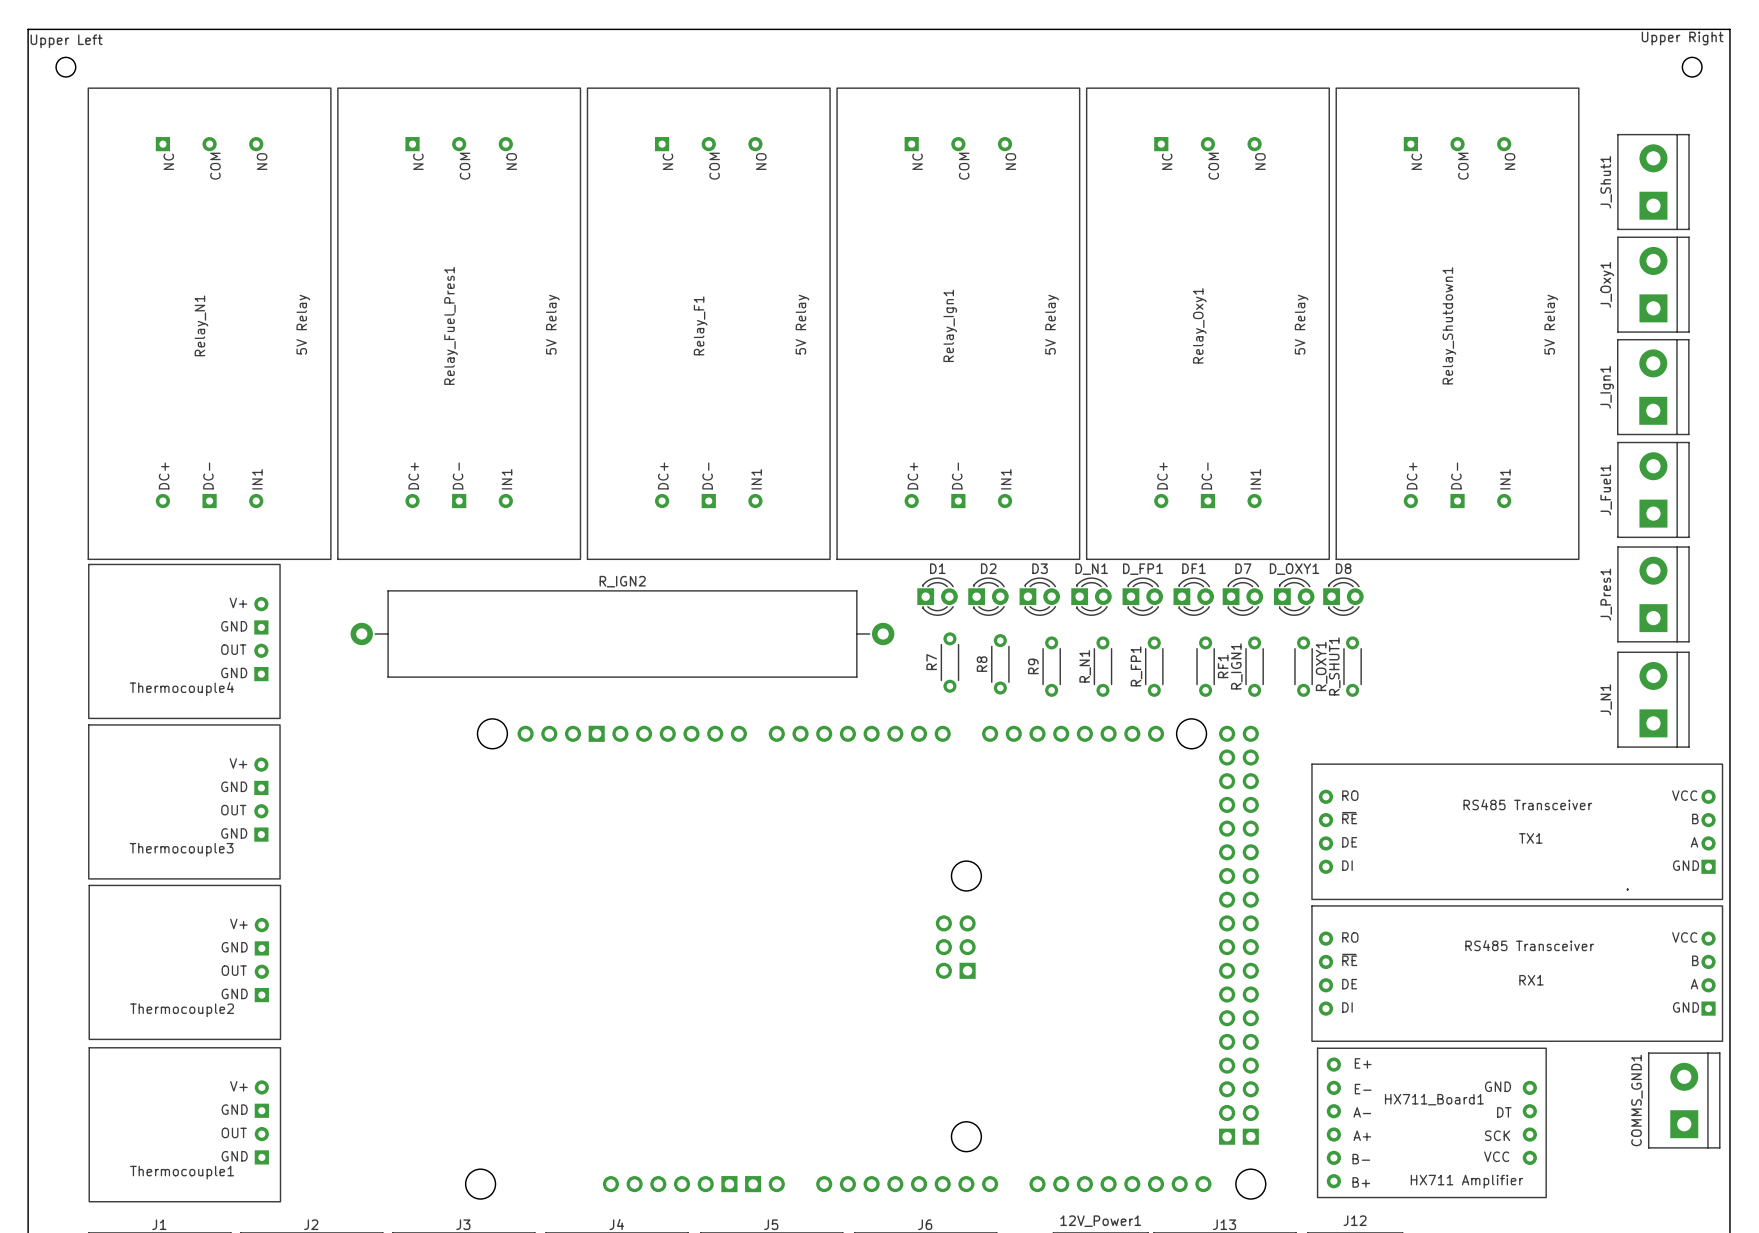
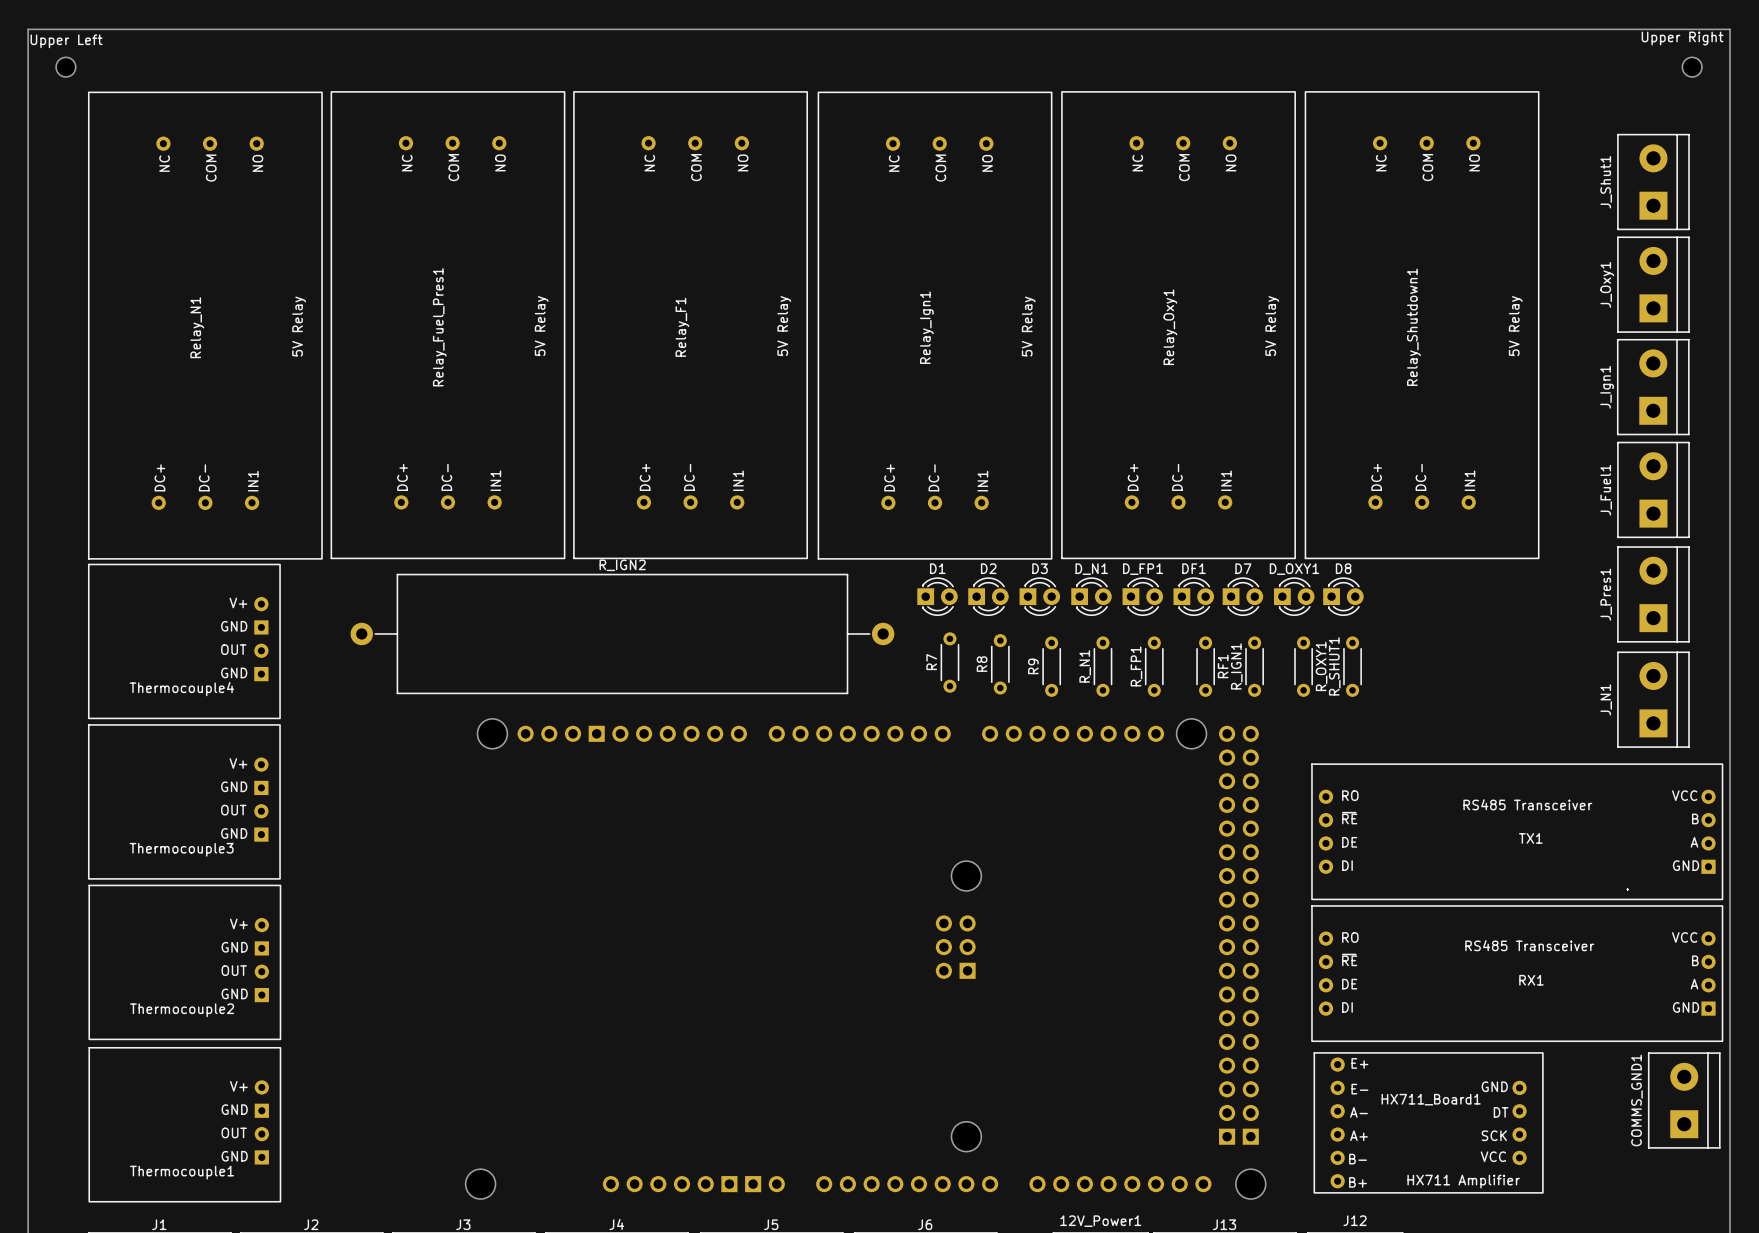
Relay_N1 footprint: [87, 87, 332, 560] -> [88, 91, 323, 560]
Relay_Fuel_Pres1 footprint: [337, 87, 581, 560] -> [330, 91, 566, 559]
Relay_F1 footprint: [587, 87, 831, 560] -> [573, 91, 808, 559]
Relay_Ign1 footprint: [836, 87, 1081, 560] -> [817, 91, 1053, 560]
Relay_Oxy1 footprint: [1086, 87, 1330, 560] -> [1061, 91, 1296, 559]
Relay_Shutdown1 footprint: [1335, 87, 1580, 560] -> [1304, 91, 1540, 559]
R_IGN2 footprint: [350, 590, 895, 678] -> [350, 573, 895, 694]
HX711_Board1 footprint: [1317, 1047, 1547, 1199] -> [1313, 1052, 1544, 1194]

